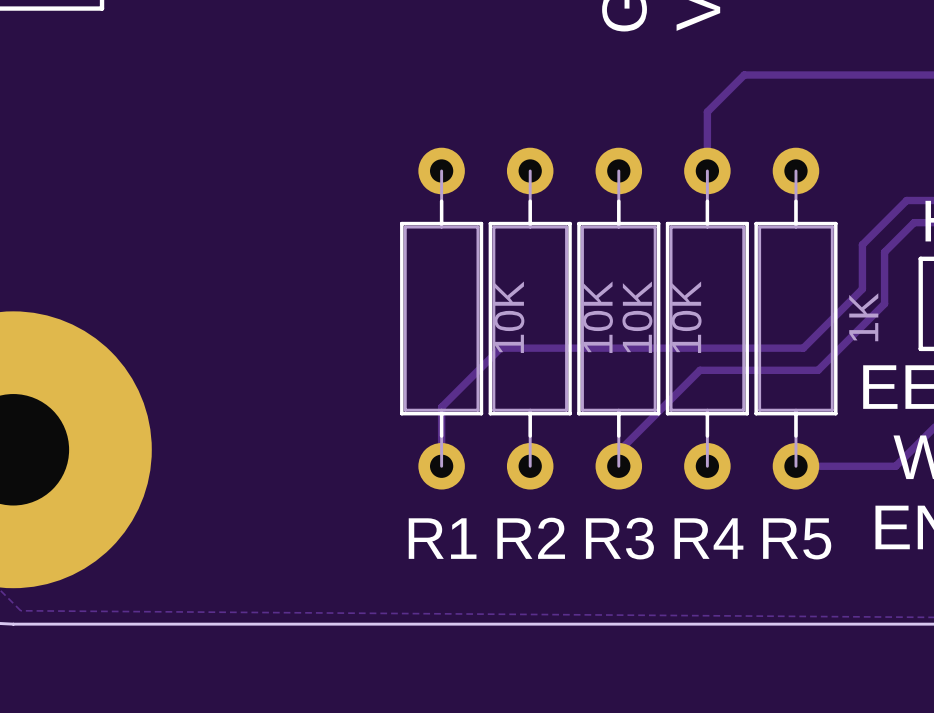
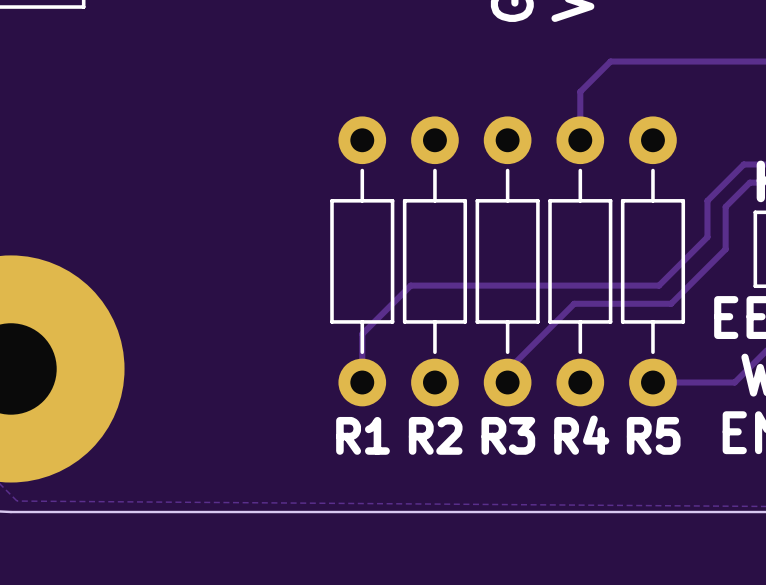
R1 footprint: [400, 147, 484, 490] -> [330, 116, 395, 407]
R2 footprint: [488, 147, 572, 490] -> [402, 116, 468, 407]
R3 footprint: [577, 147, 661, 490] -> [475, 116, 540, 407]
R4 footprint: [665, 147, 749, 490] -> [548, 116, 613, 407]
R5 footprint: [754, 147, 838, 490] -> [620, 116, 686, 407]
R1 value: 10K (509, 317) -> none
R2 value: 10K (597, 317) -> none
R4 value: 10K (637, 317) -> none
R3 value: 10K (686, 317) -> none
R5 value: 1K (863, 317) -> none

